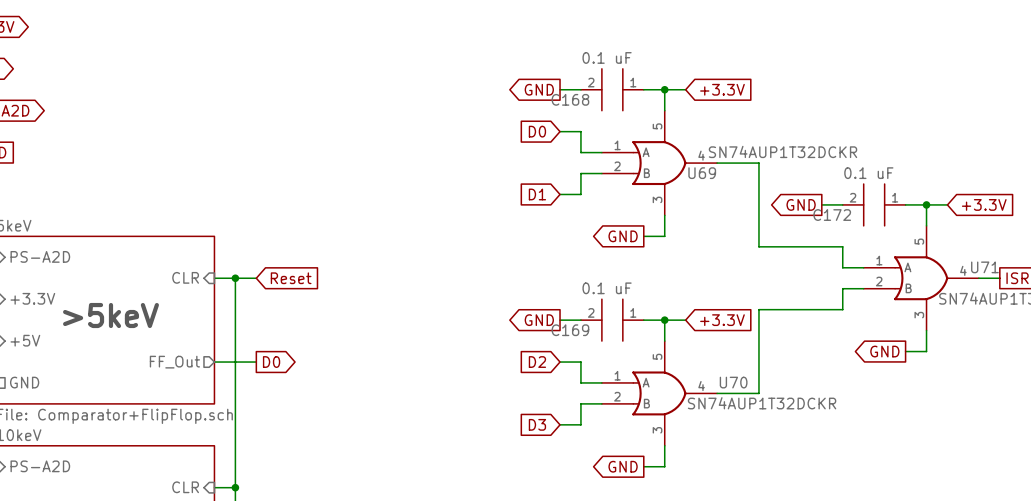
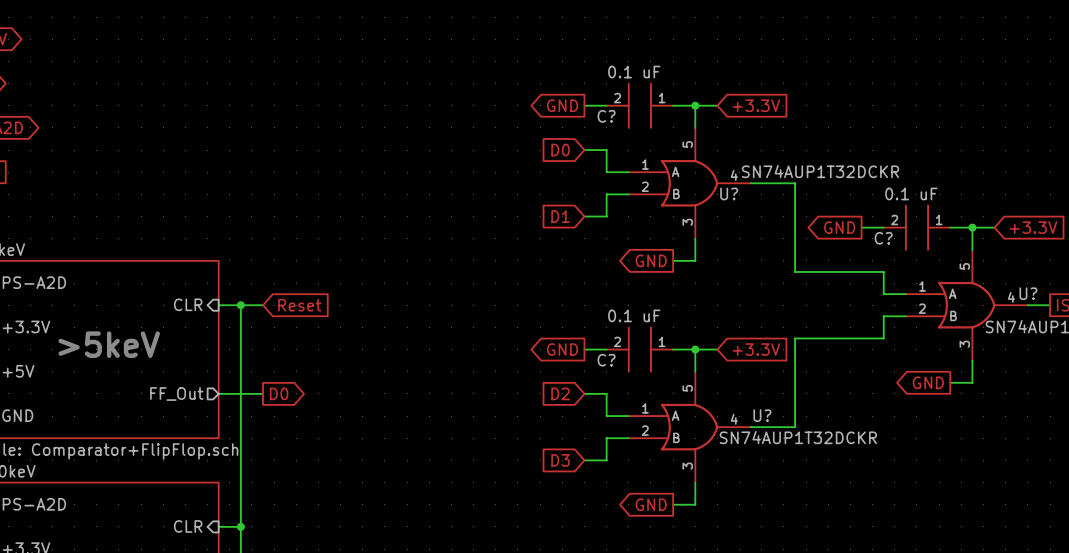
C168 name: C168 (570, 99) -> C? (606, 116)
U69 name: U69 (702, 173) -> U? (729, 193)
C172 name: C172 (832, 215) -> C? (883, 238)
U71 name: U71 (984, 267) -> U? (1028, 293)
C169 name: C169 (570, 330) -> C? (606, 360)
U70 name: U70 (733, 382) -> U? (762, 415)

